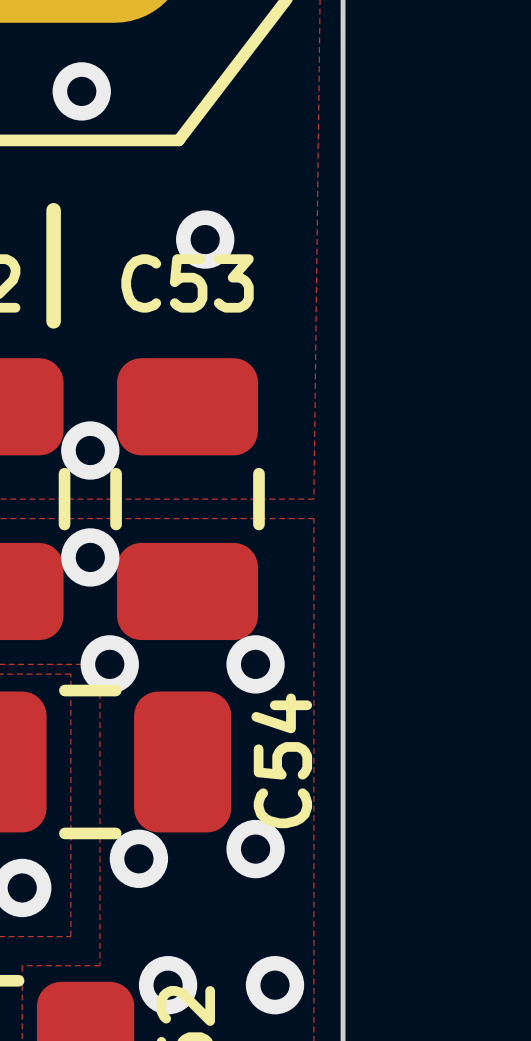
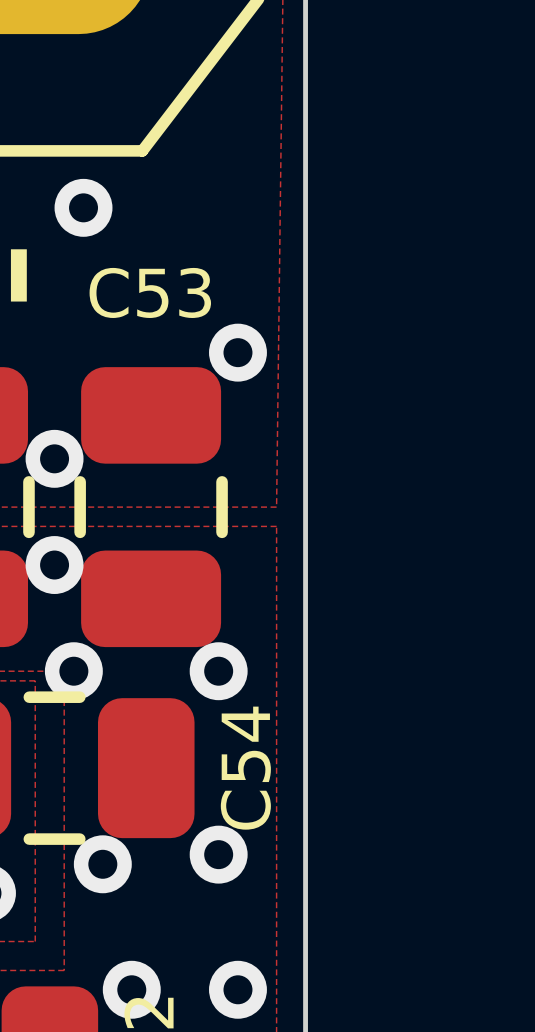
via: (81, 91) -> none
via: none -> (83, 207)
via: (205, 239) -> none
via: none -> (237, 352)

